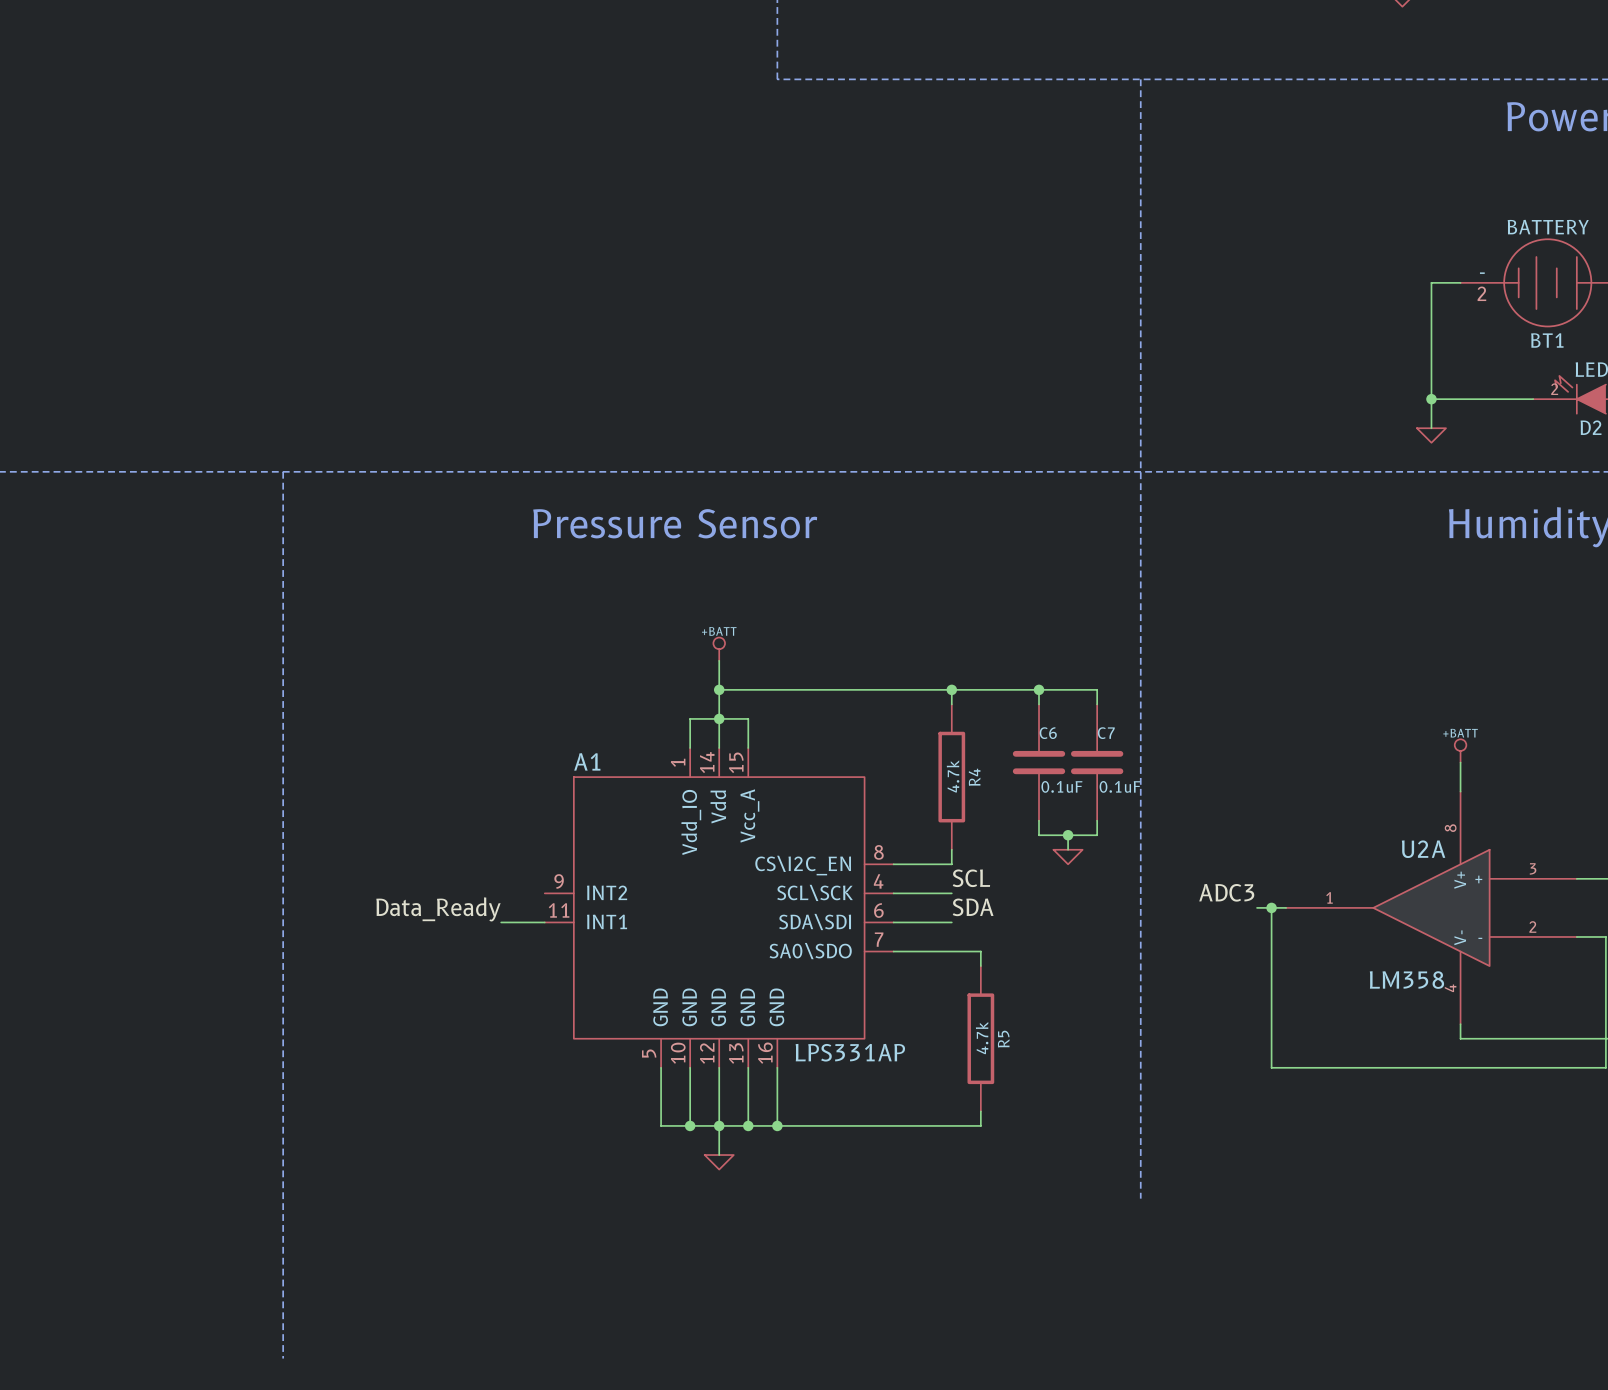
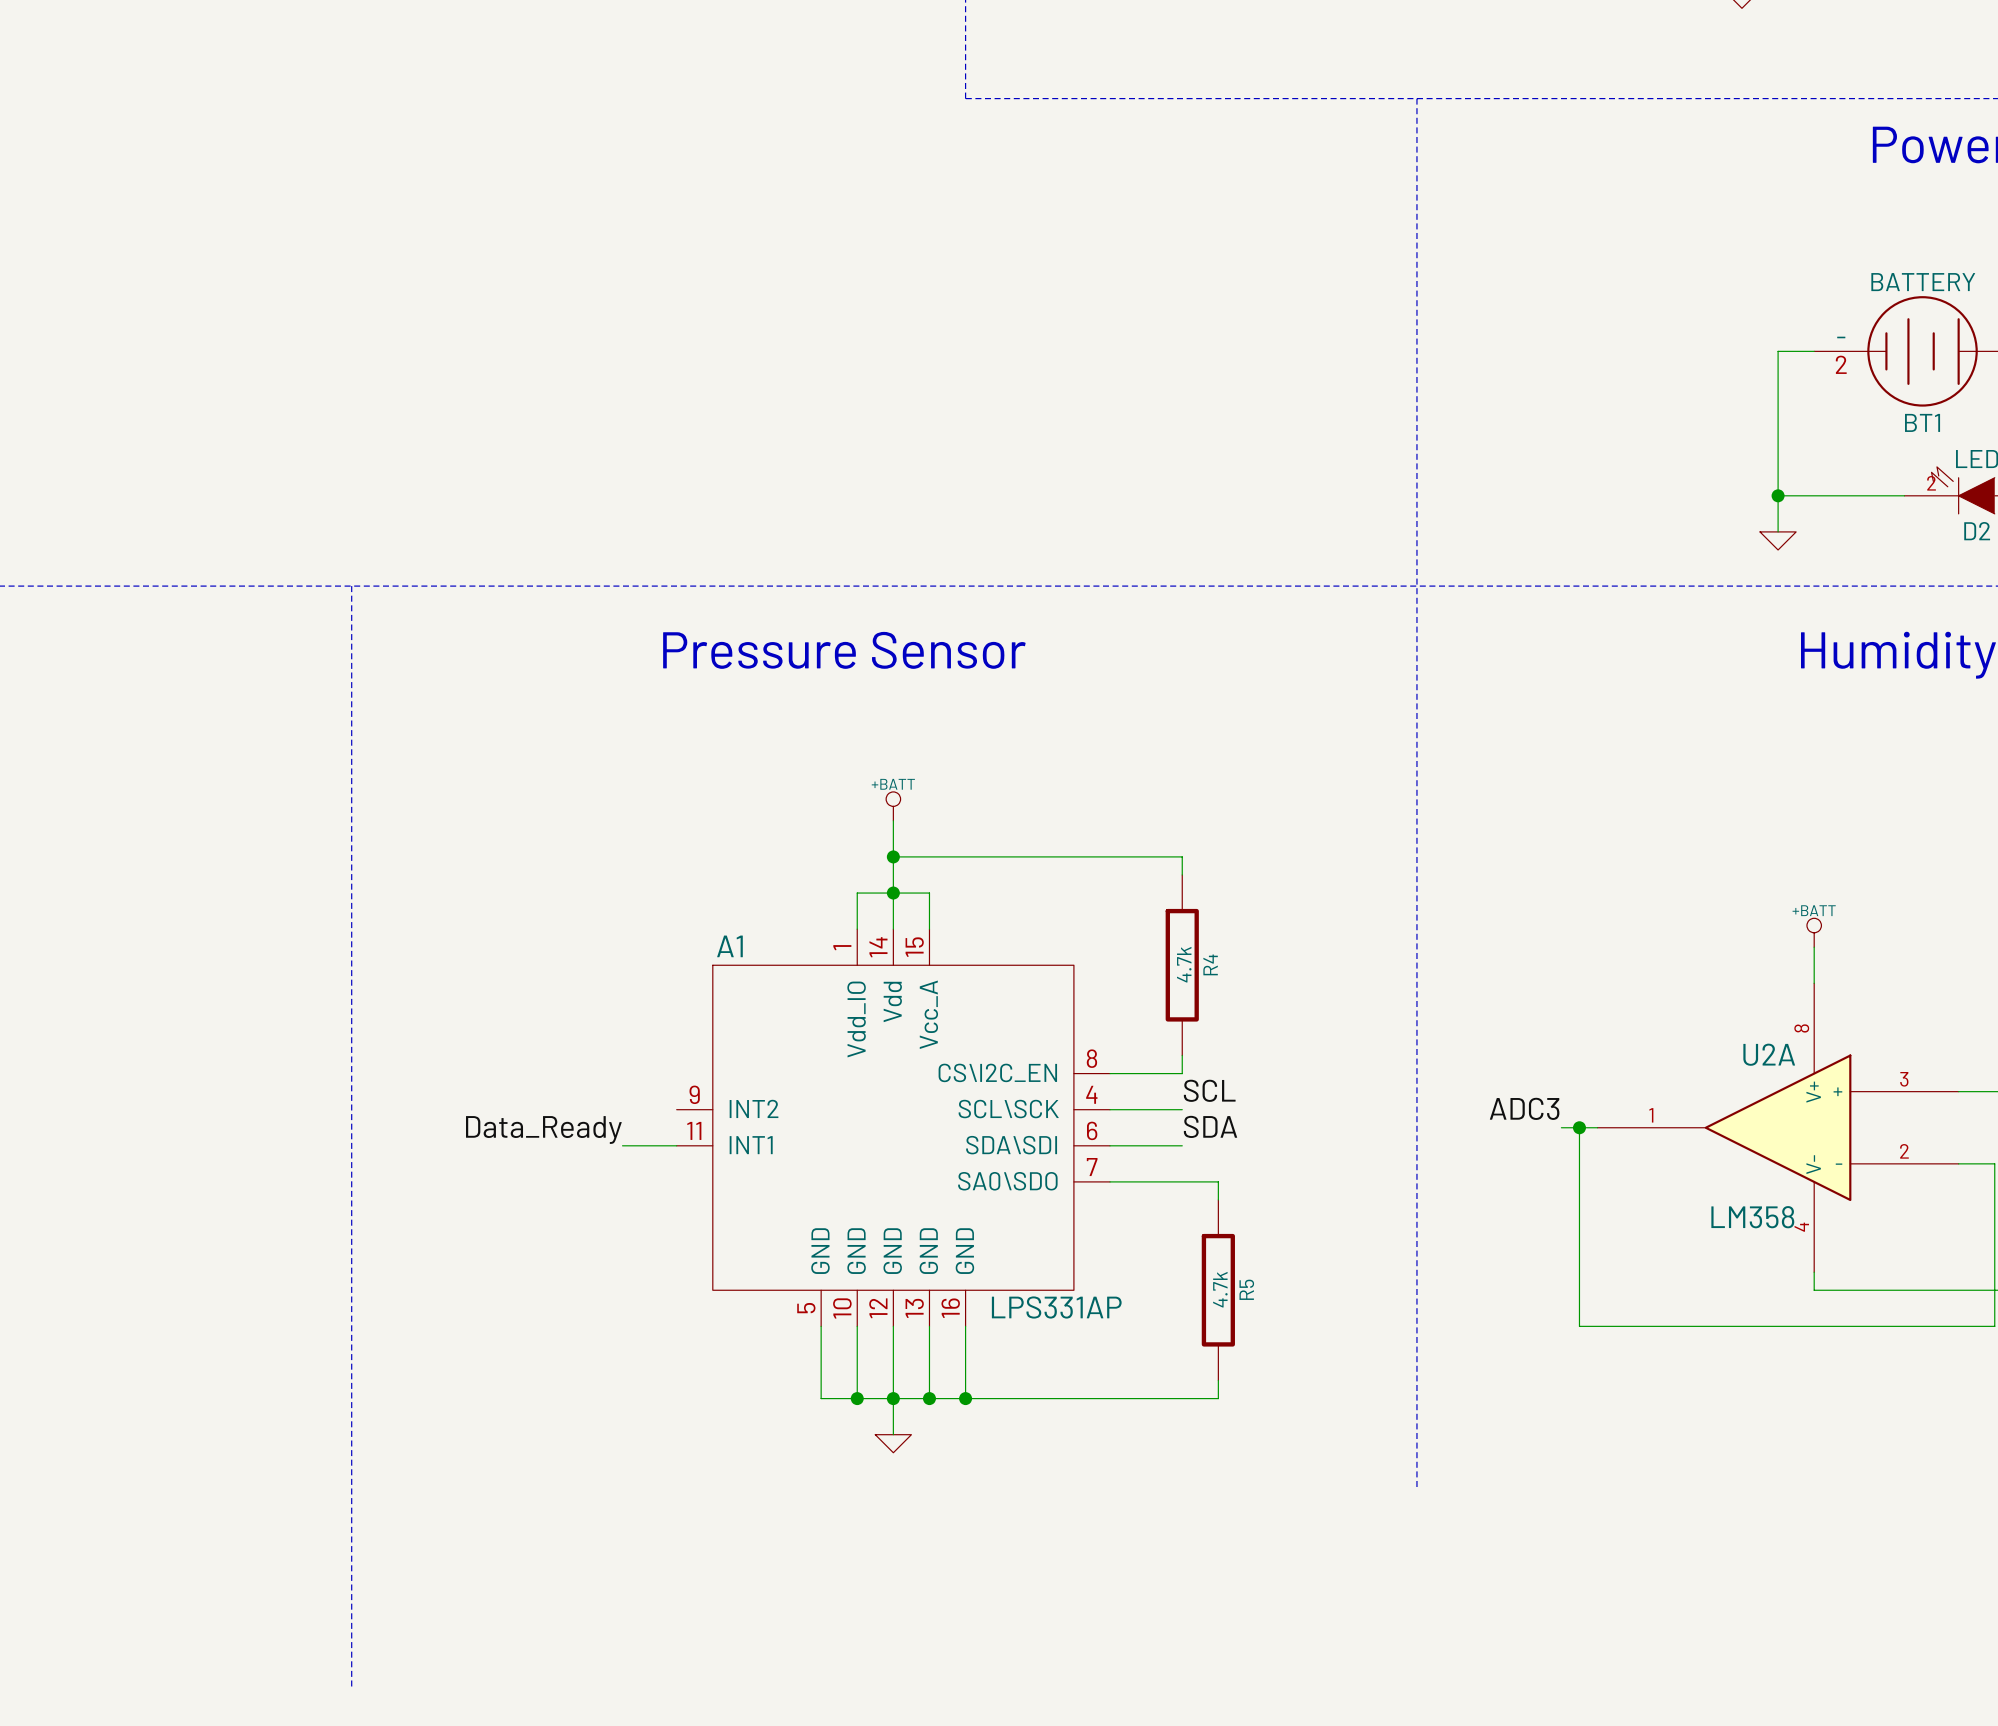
wire: (951, 689) (1097, 689) (1097, 704) -> none
junction: (951, 689) -> none
wire: (1039, 689) (1039, 704) -> none
junction: (1039, 689) -> none
C6: 0.1uF (1039, 762) -> none
C7: 0.1uF (1097, 762) -> none
wire: (1039, 820) (1039, 835) (1097, 835) (1097, 820) -> none
wire: (1068, 835) (1068, 849) -> none
junction: (1068, 835) -> none
power symbol: (1068, 857) -> none

